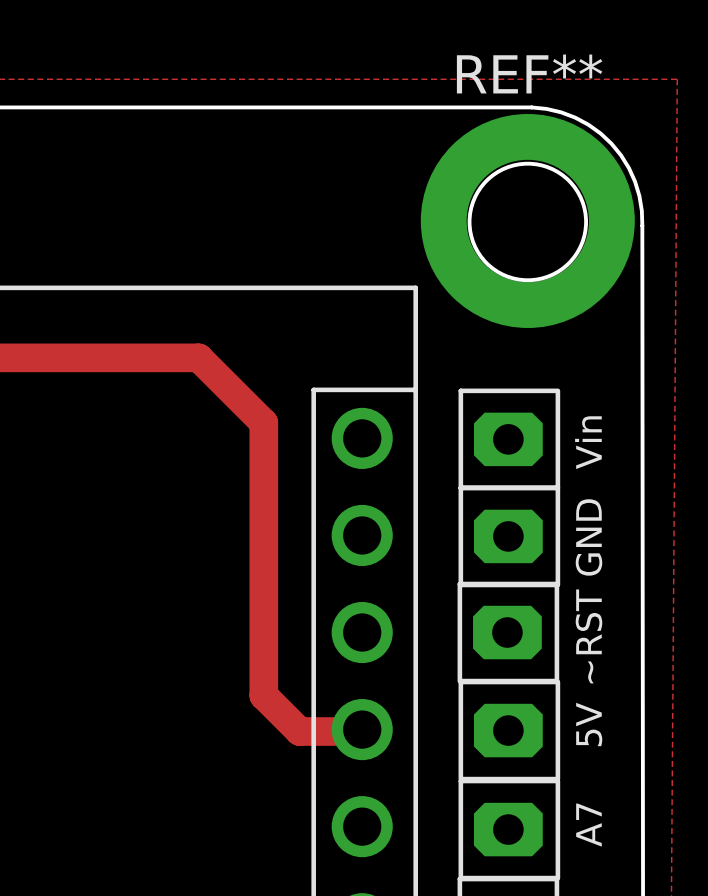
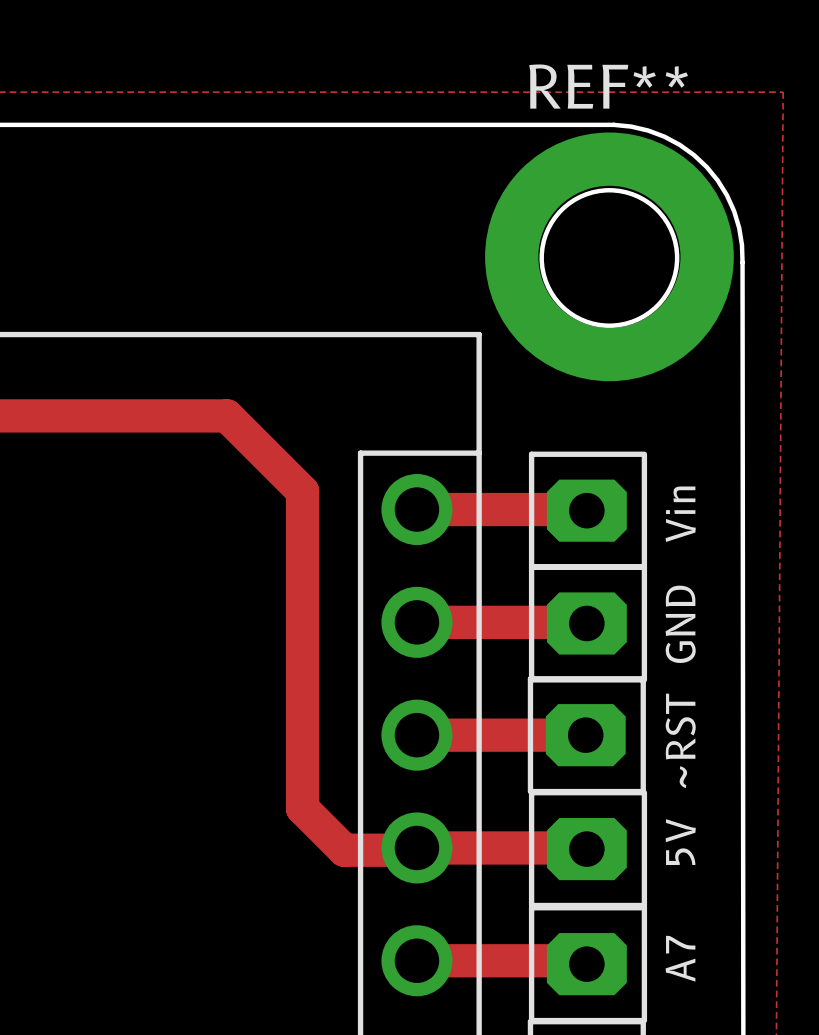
track: none -> (416, 509) (586, 510)
track: none -> (416, 622) (586, 623)
track: none -> (416, 735) (585, 735)
track: none -> (416, 847) (586, 849)
track: none -> (416, 960) (583, 960) (586, 964)

